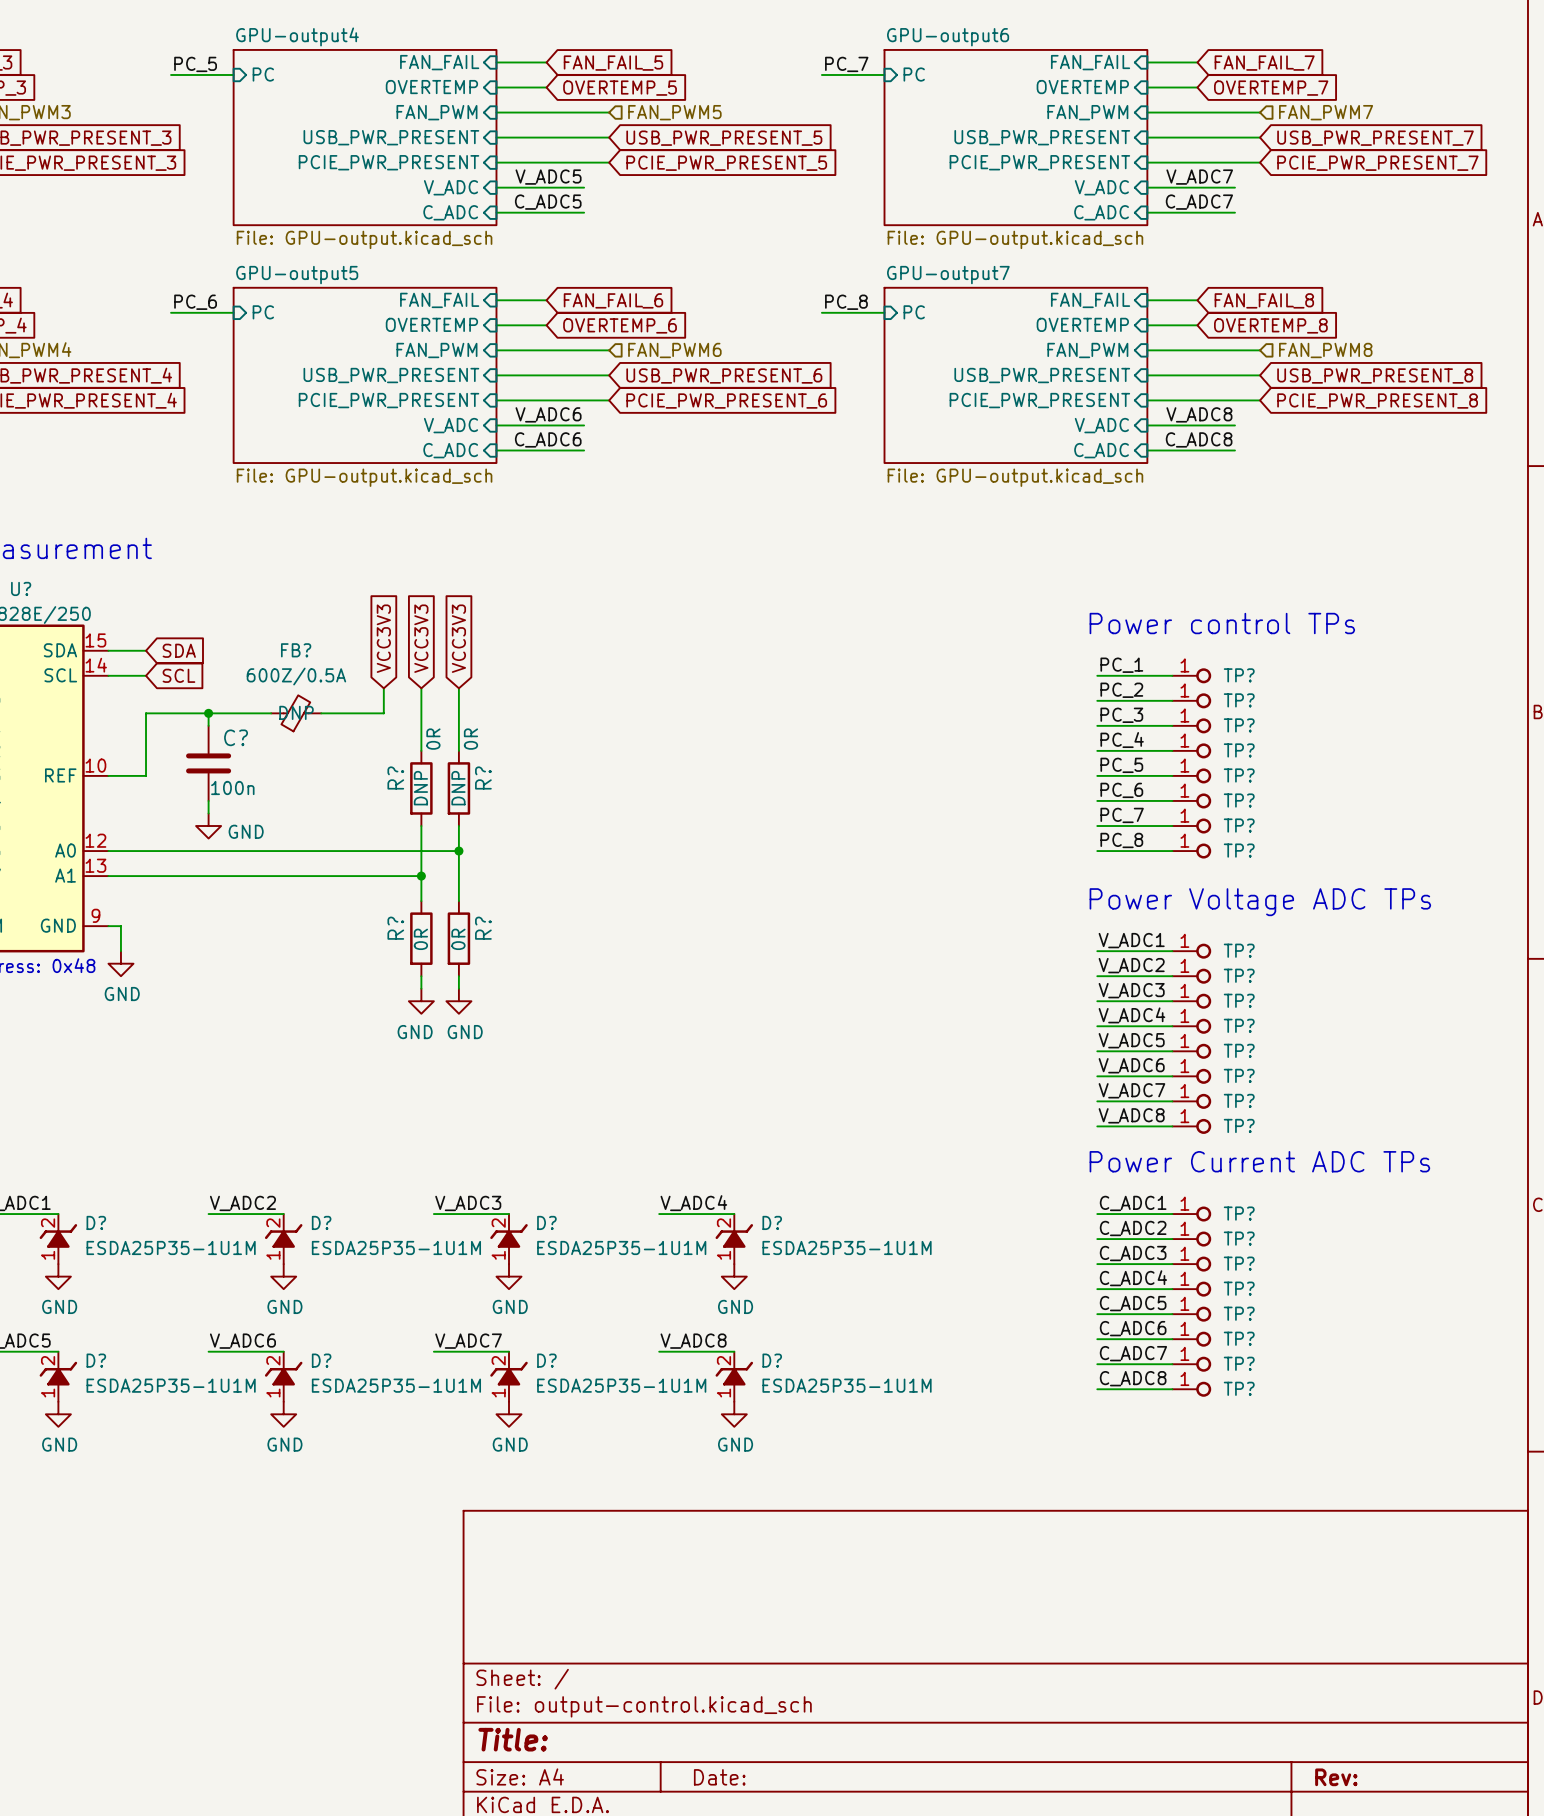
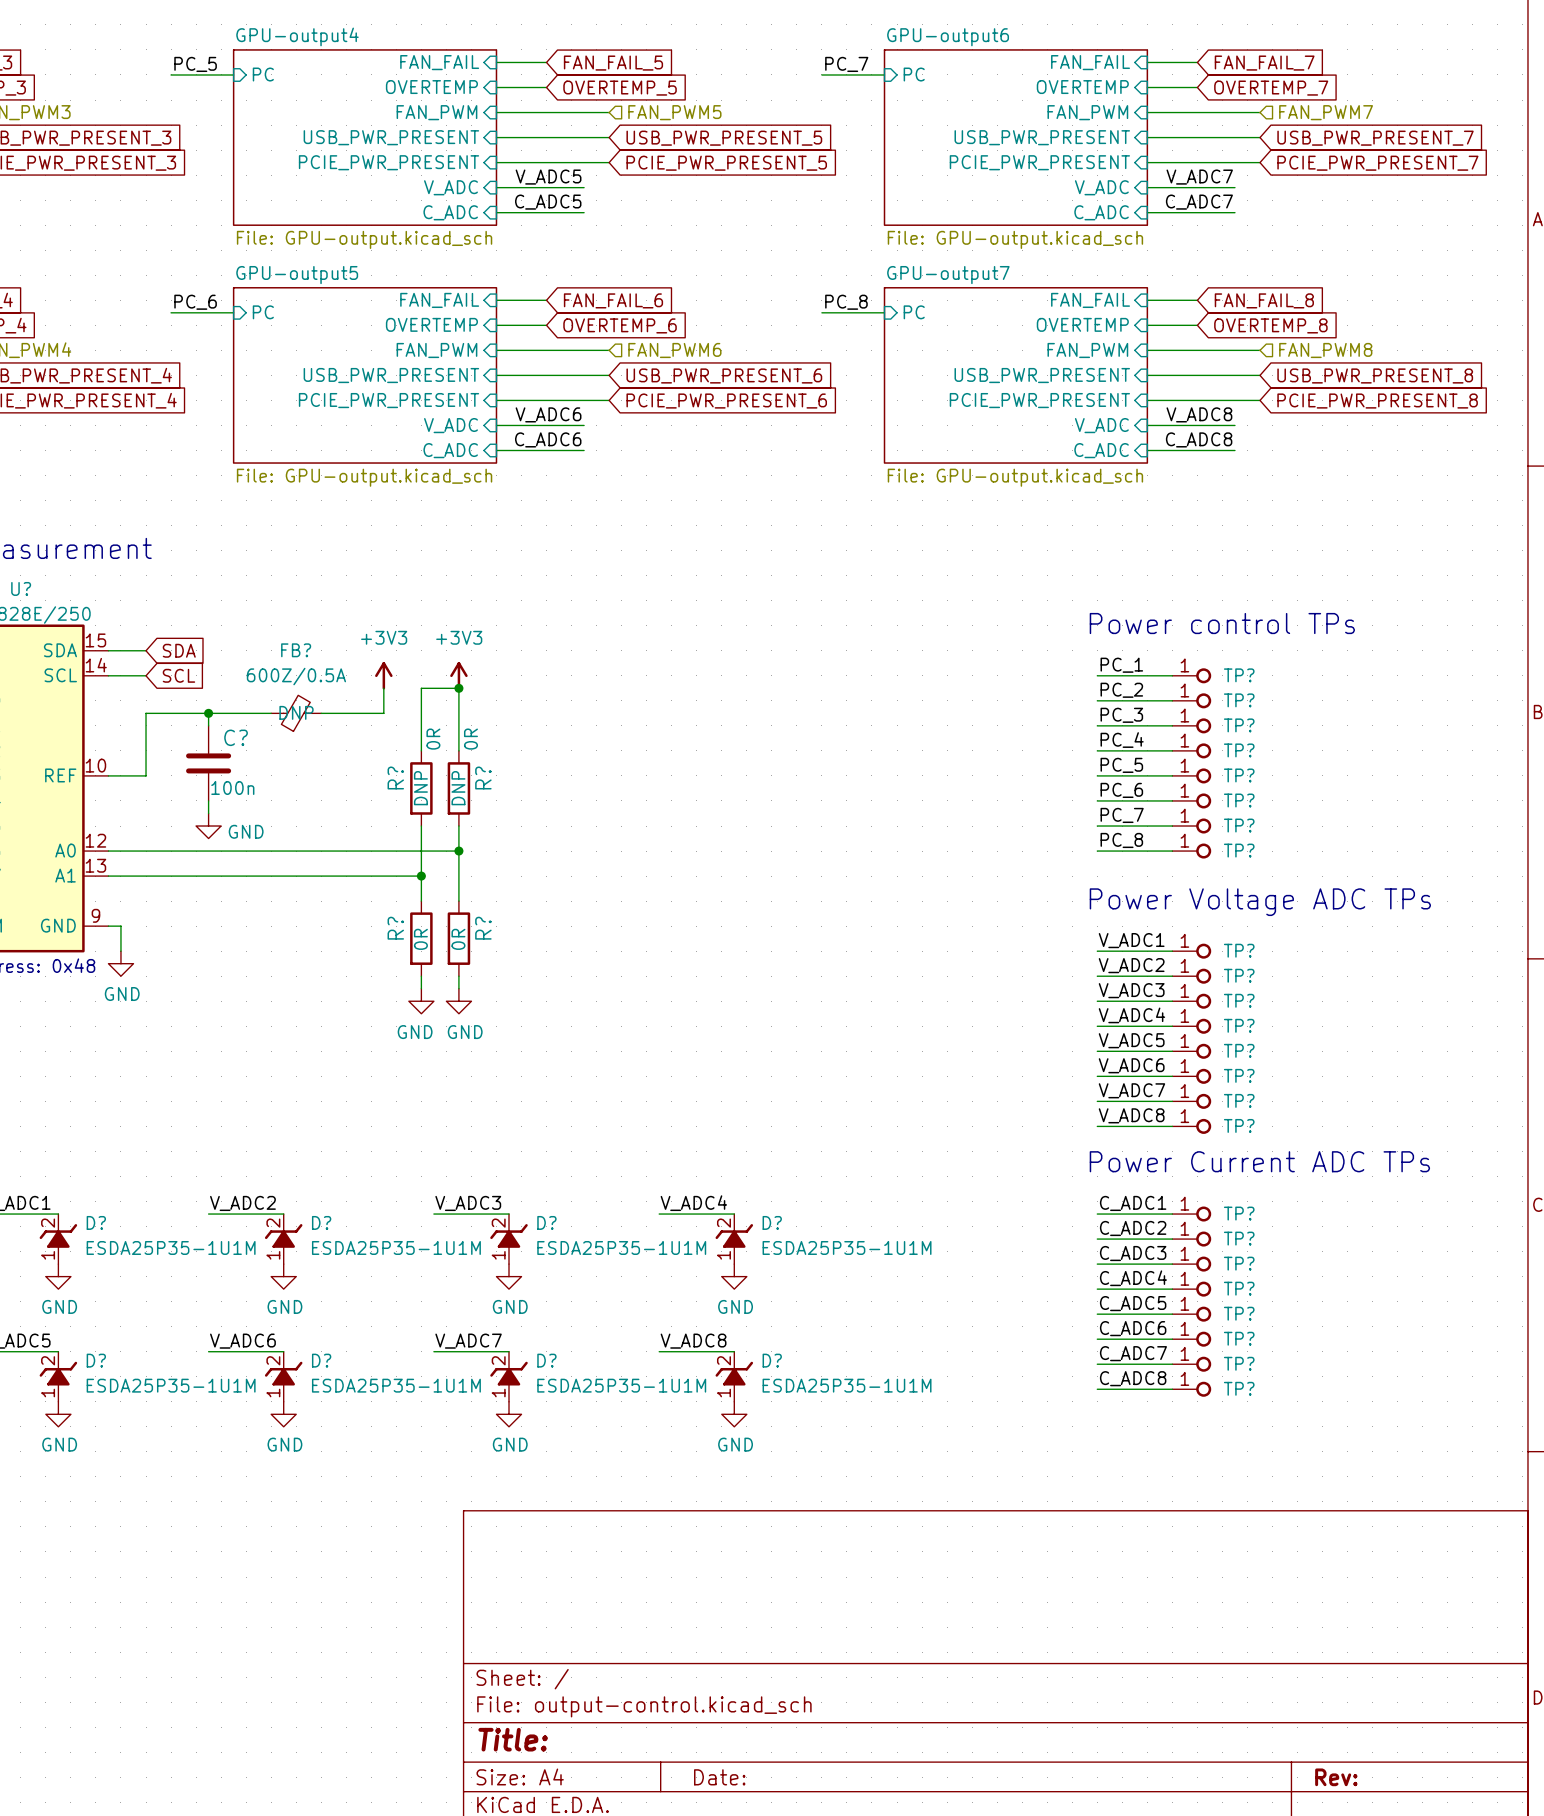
global label: VCC3V3 (383, 638) -> none
global label: VCC3V3 (421, 638) -> none
global label: VCC3V3 (458, 638) -> none
power symbol: none -> +3V3 (383, 675)
power symbol: none -> +3V3 (458, 675)
wire: none -> (421, 688) (458, 688)
junction: none -> (458, 688)

